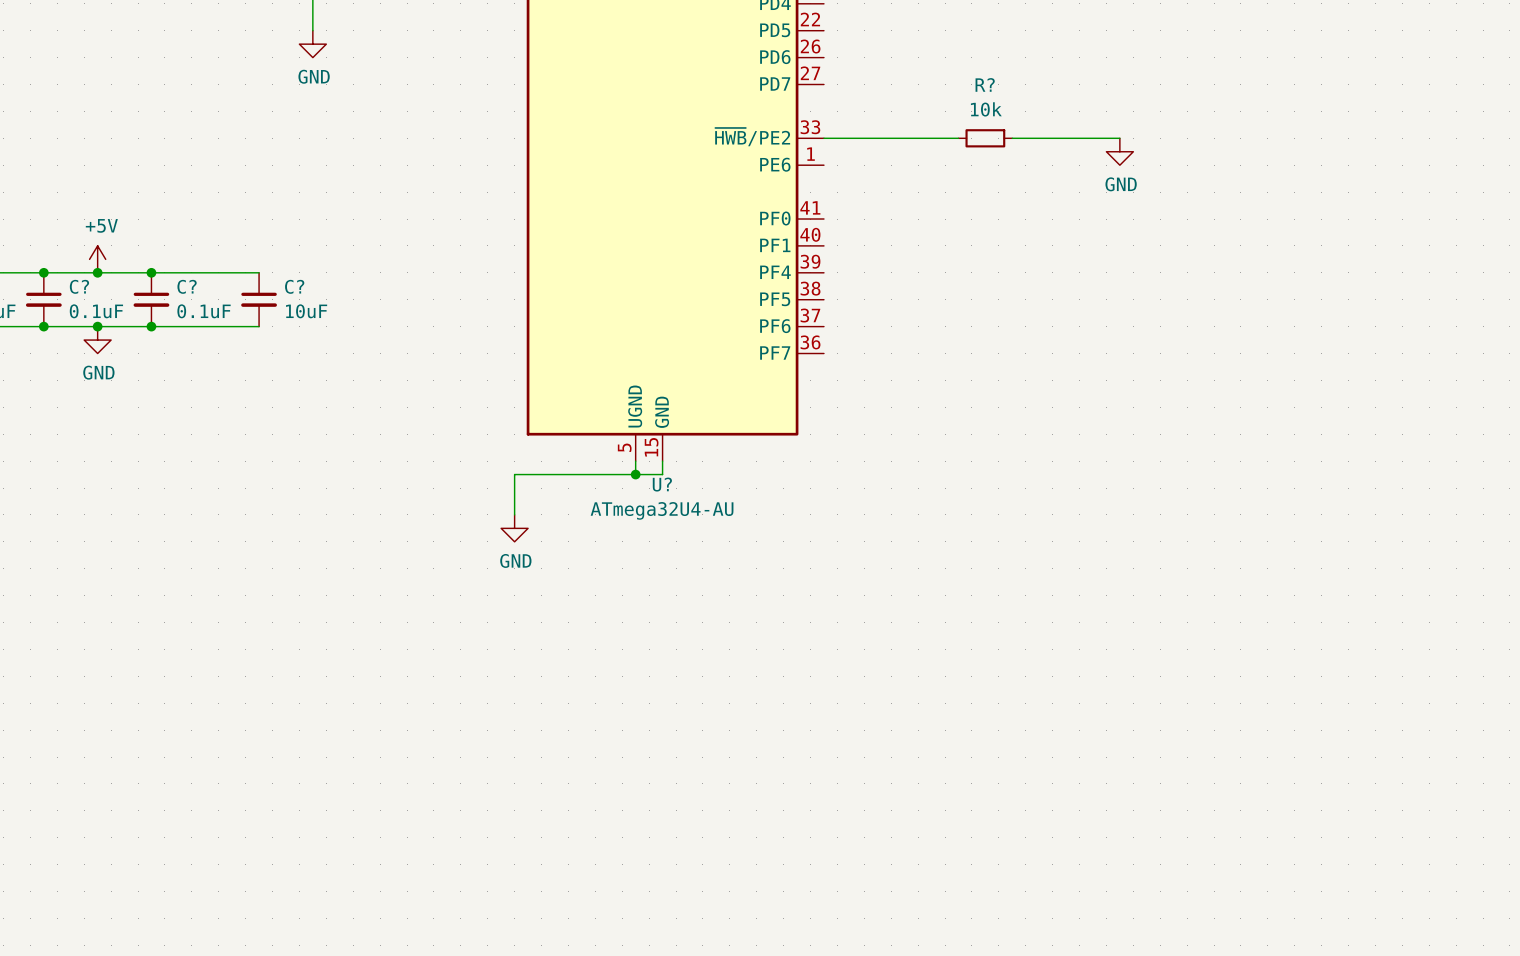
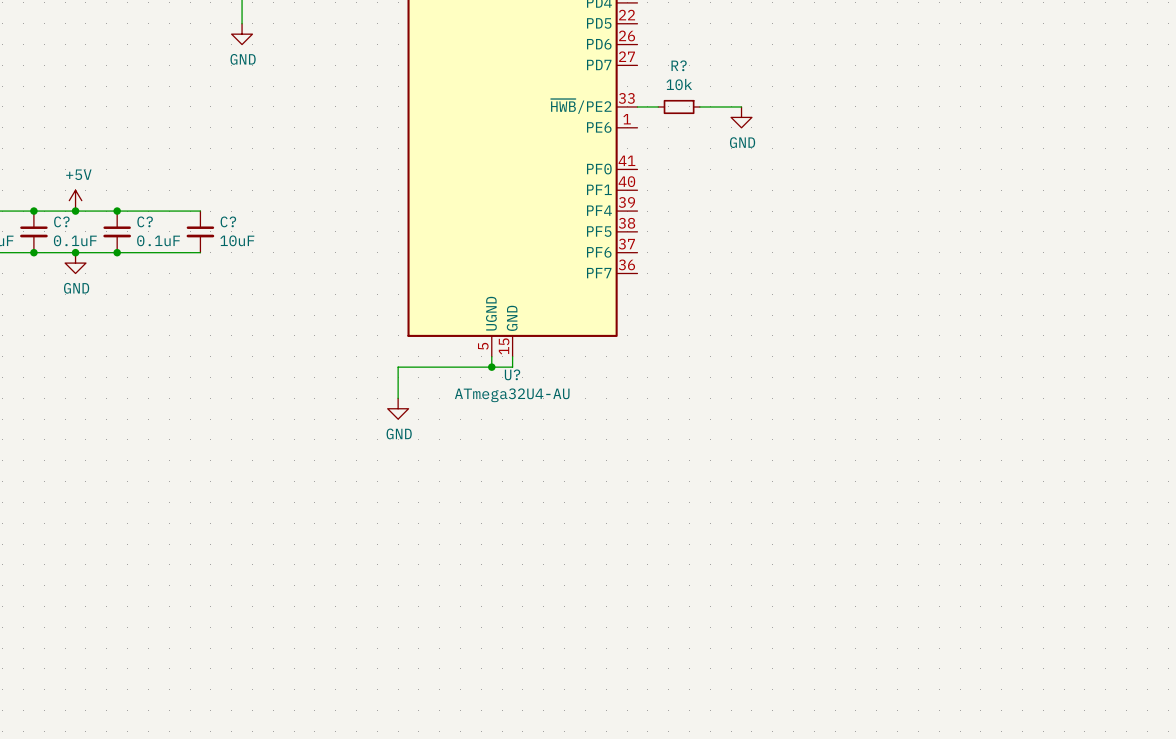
wire: (850, 138) (904, 138) -> none
R? position: (985, 138) -> (679, 106)
wire: (1012, 138) (1119, 138) -> none
power symbol position: GND (1119, 151) -> GND (741, 117)

